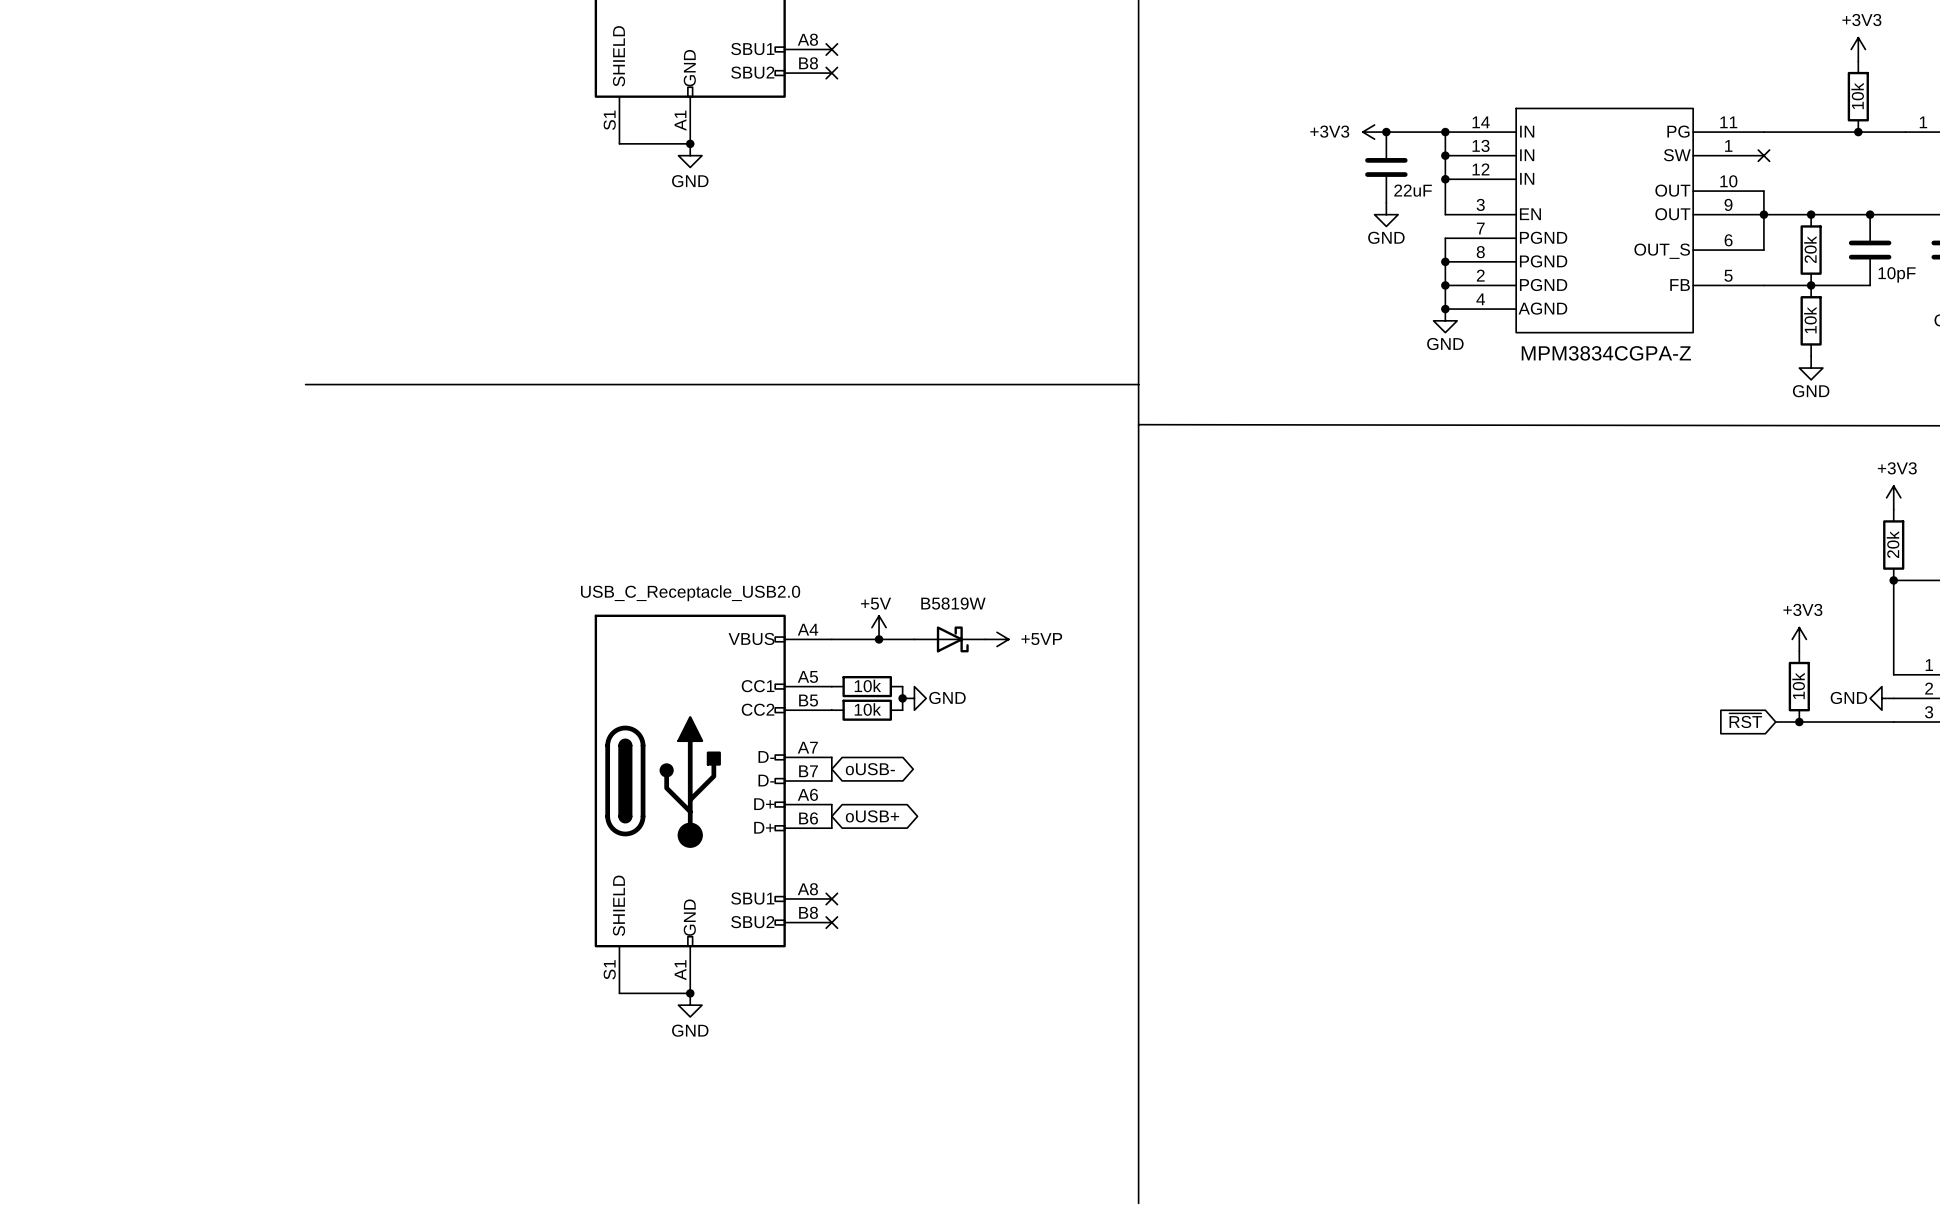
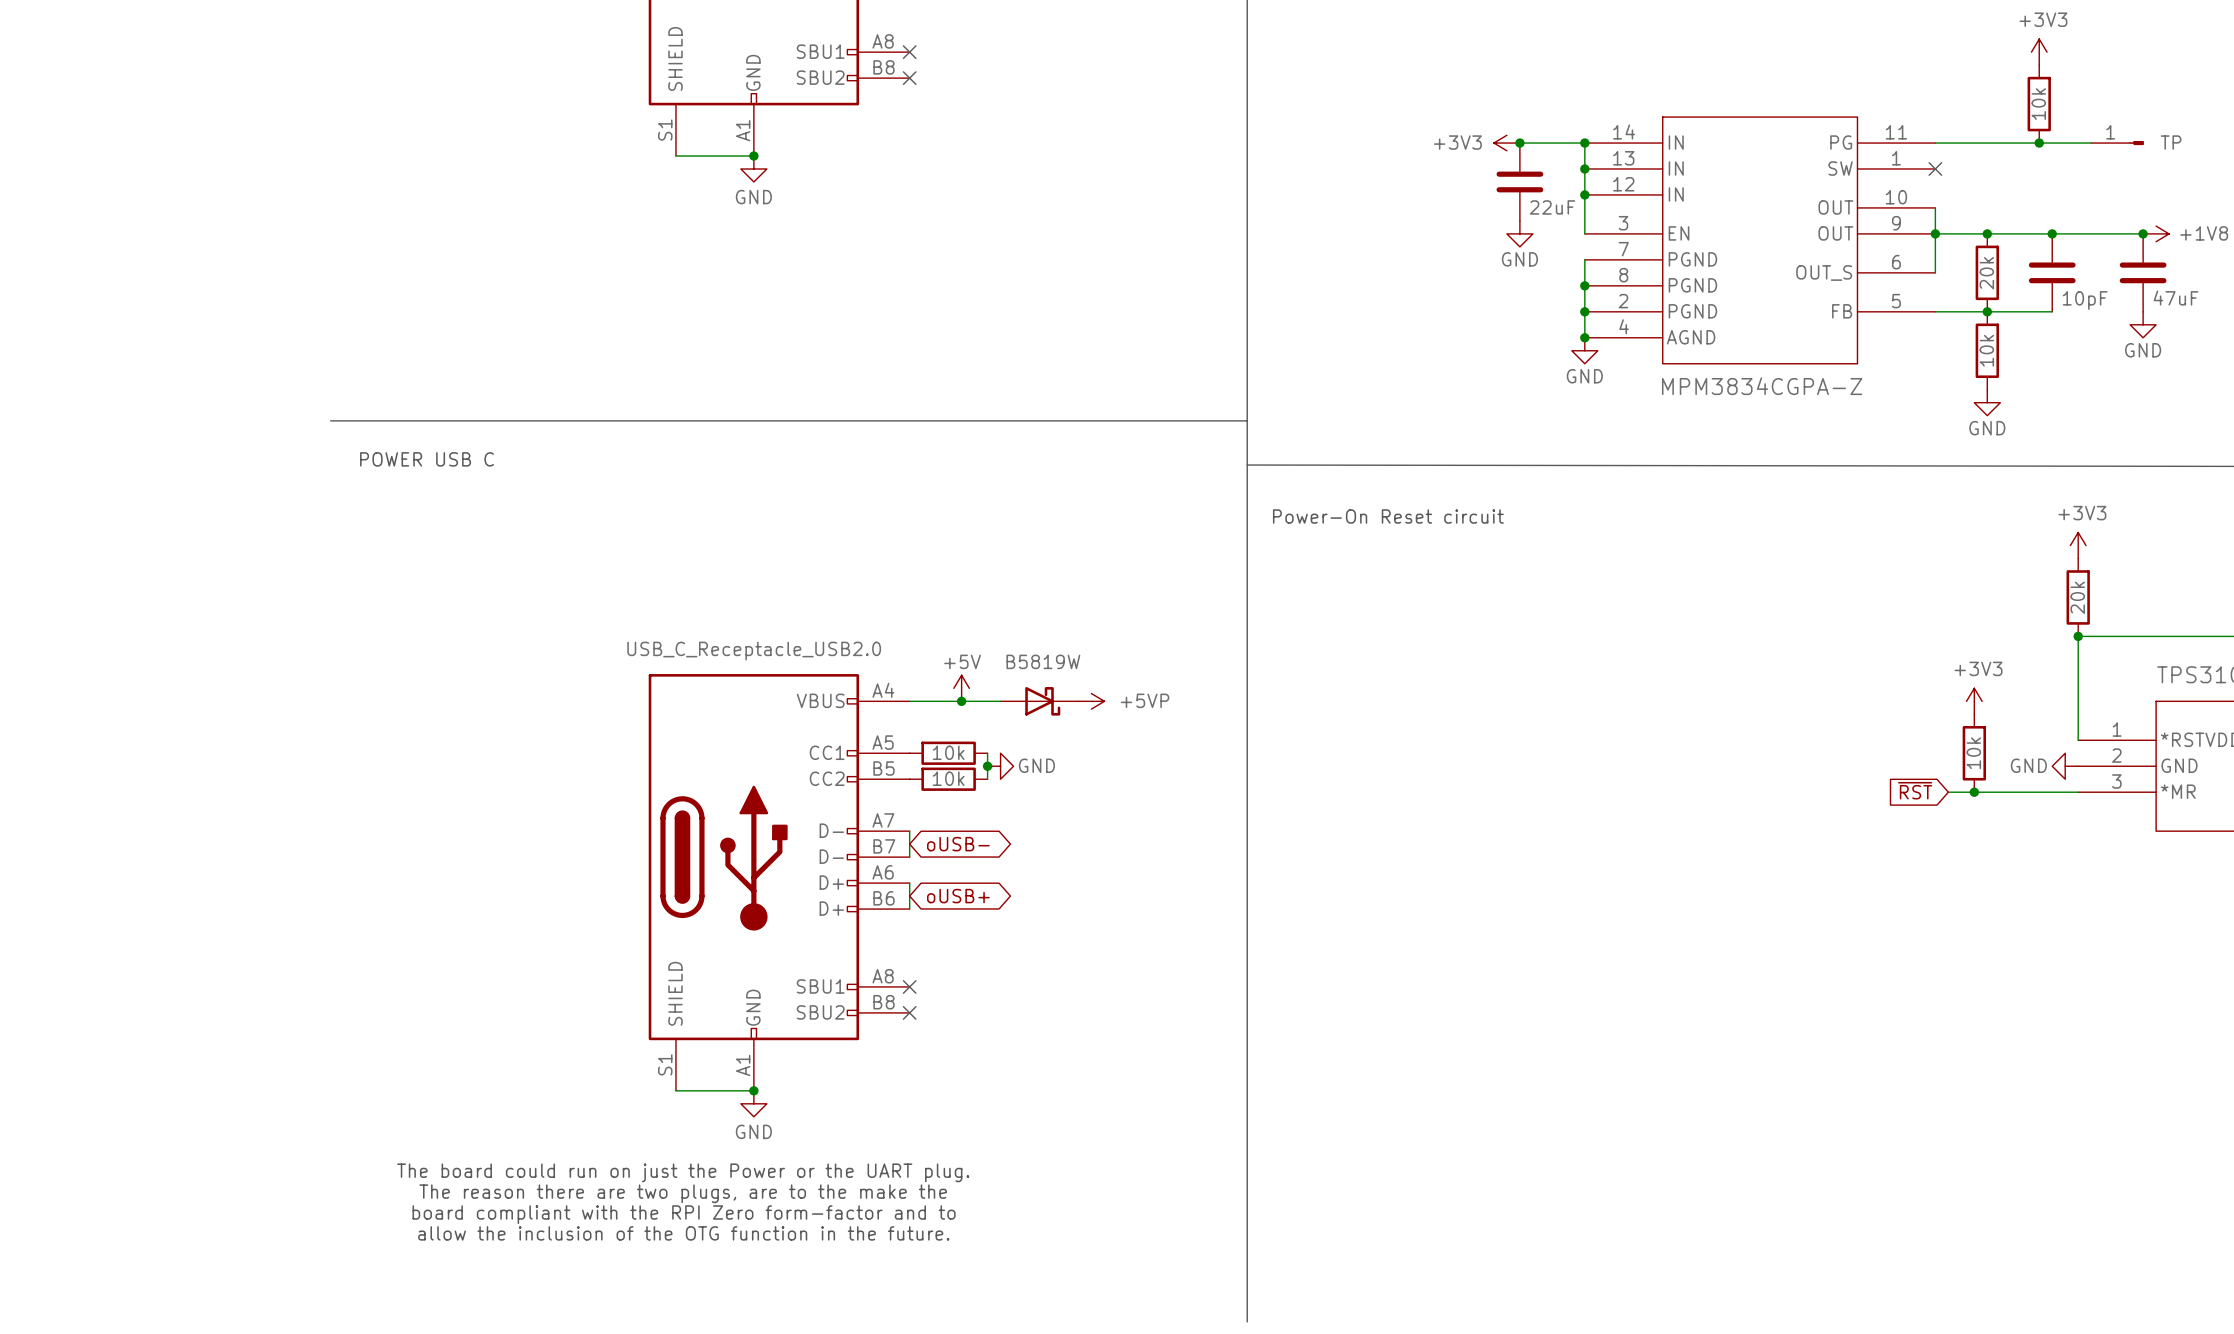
text: none -> POWER USB C (427, 459)
text: none -> Power-On Reset circuit (1388, 516)
text: none -> The board could run on just the Power or the UART plug. (683, 1172)
text: none -> The reason there are two plugs, are to the make the (683, 1193)
text: none -> board compliant with the RPI Zero form-factor and to (684, 1214)
text: none -> allow the inclusion of the OTG function in the future. (683, 1233)

